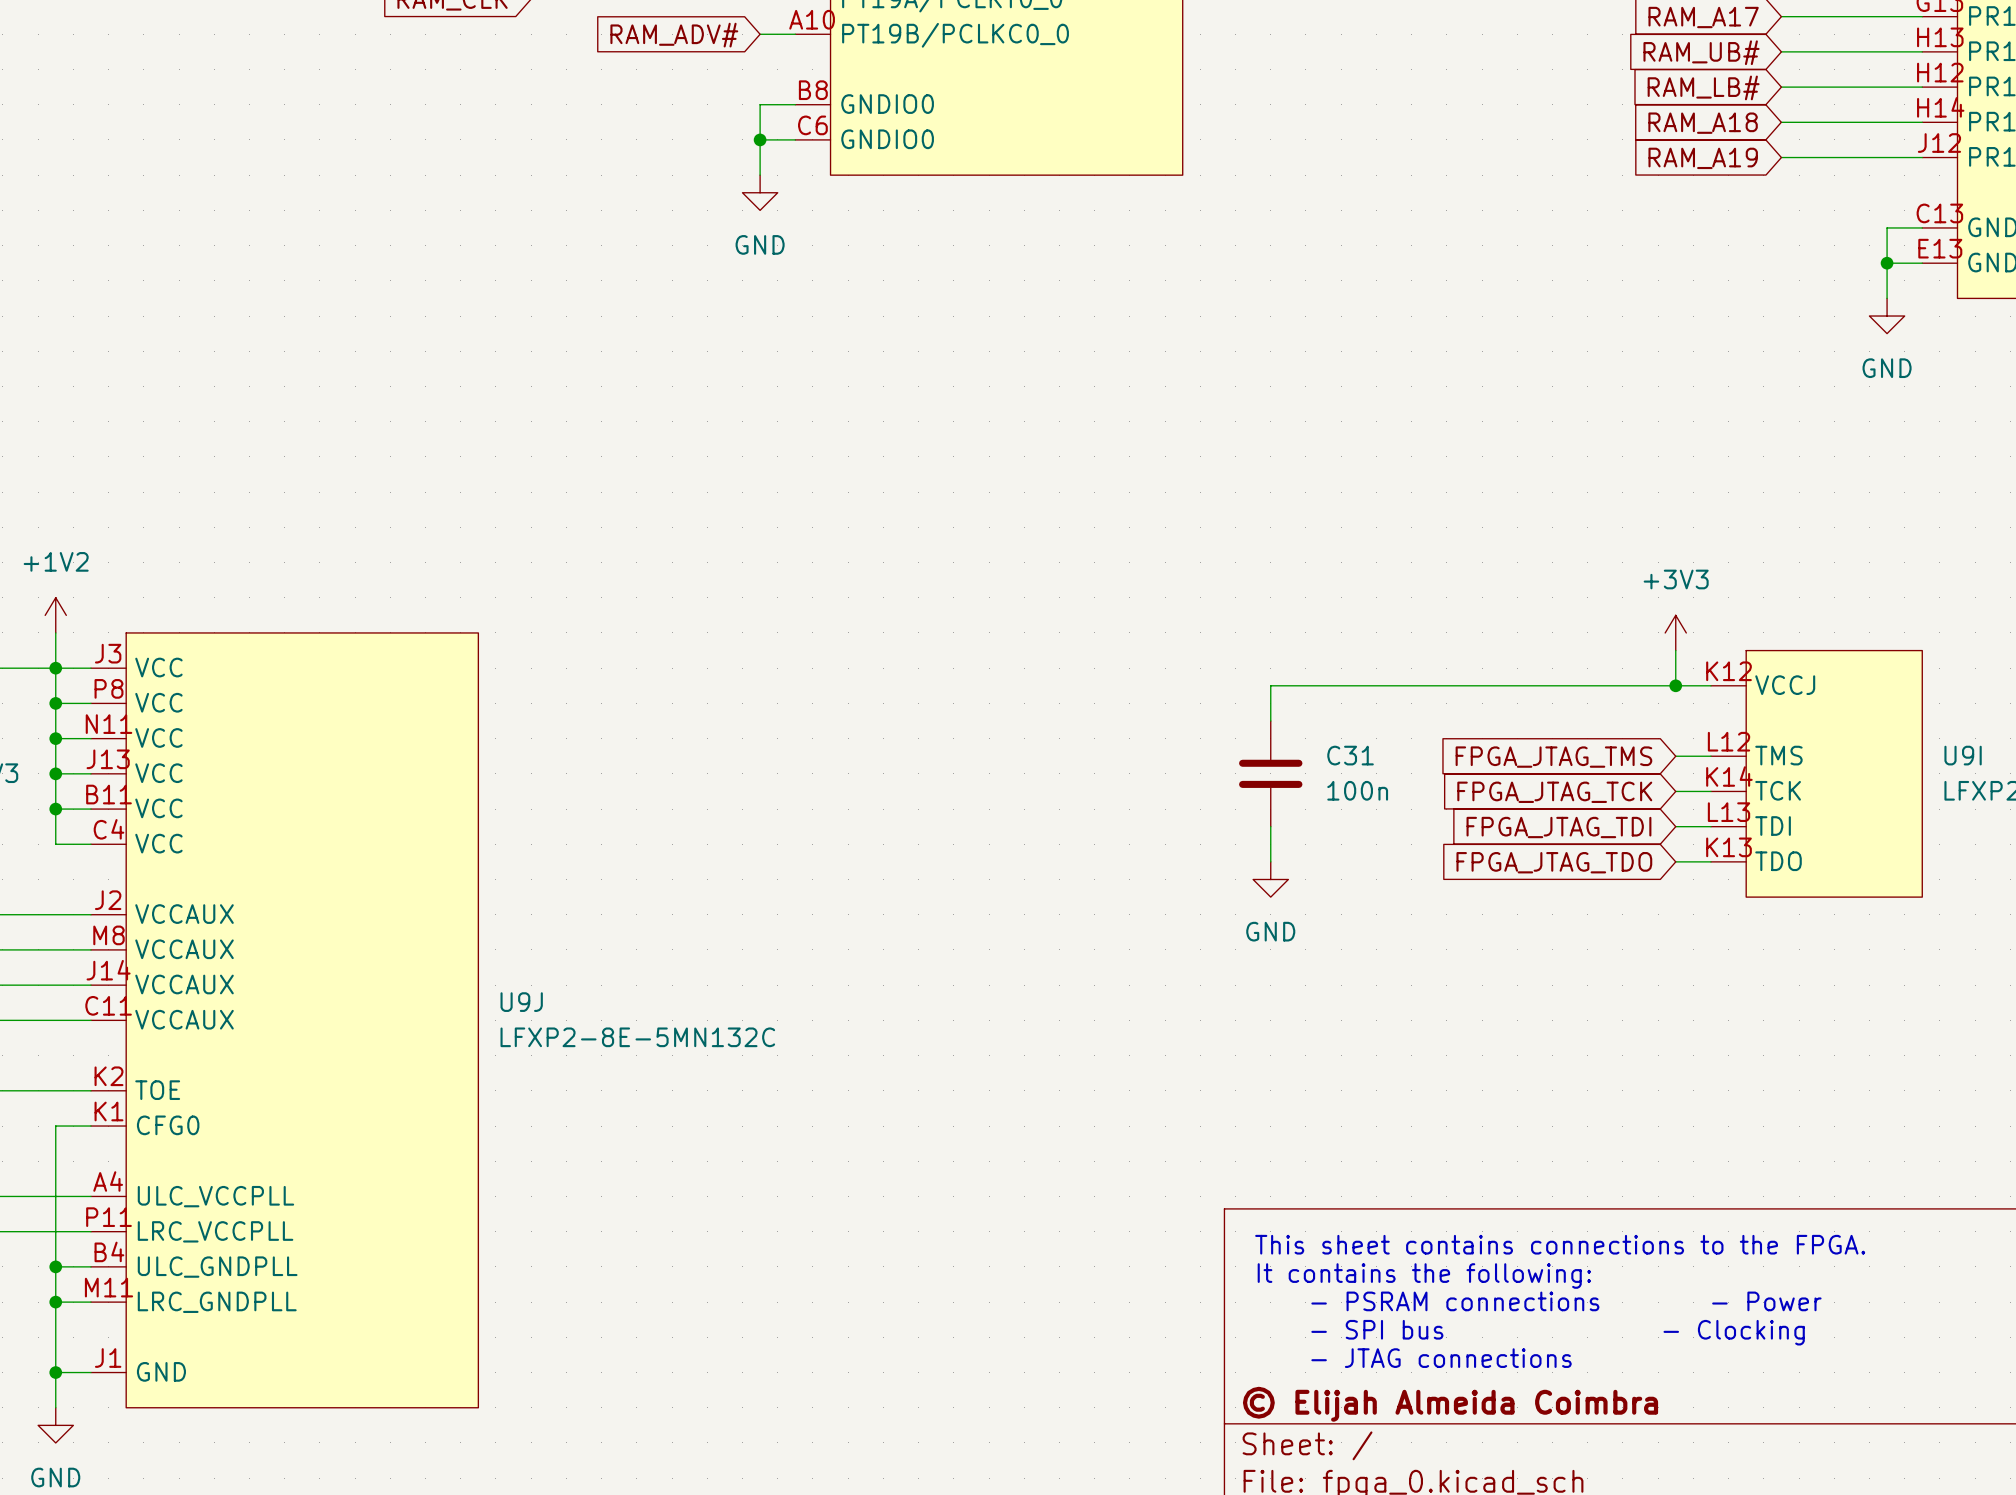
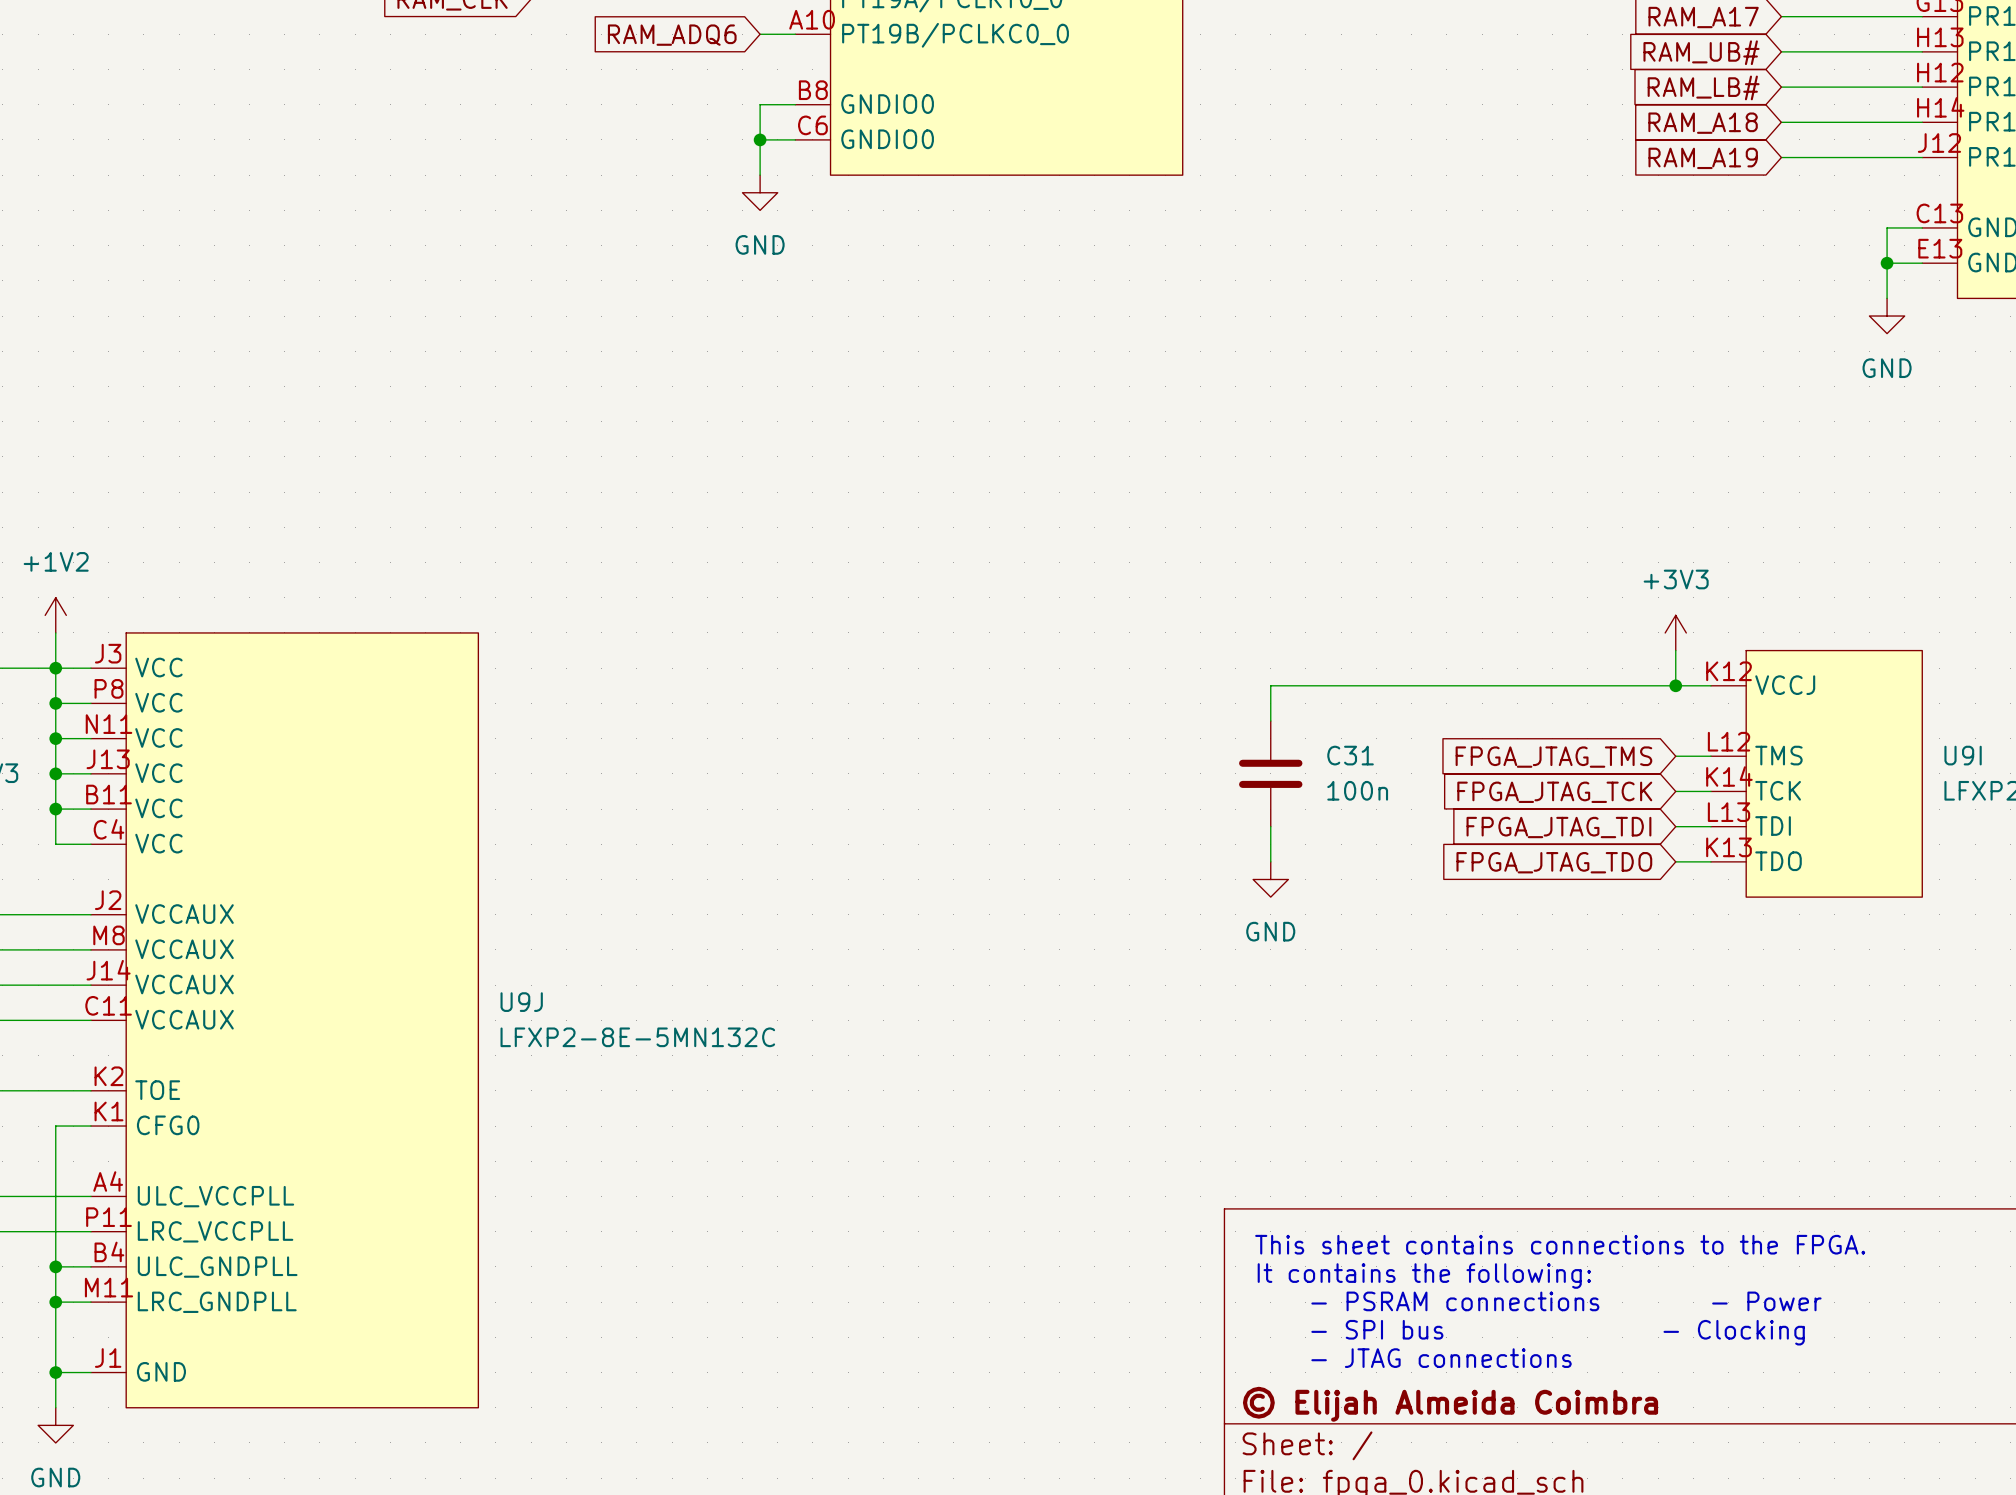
global label: RAM_ADV# (674, 35) -> RAM_ADQ6 (672, 35)

